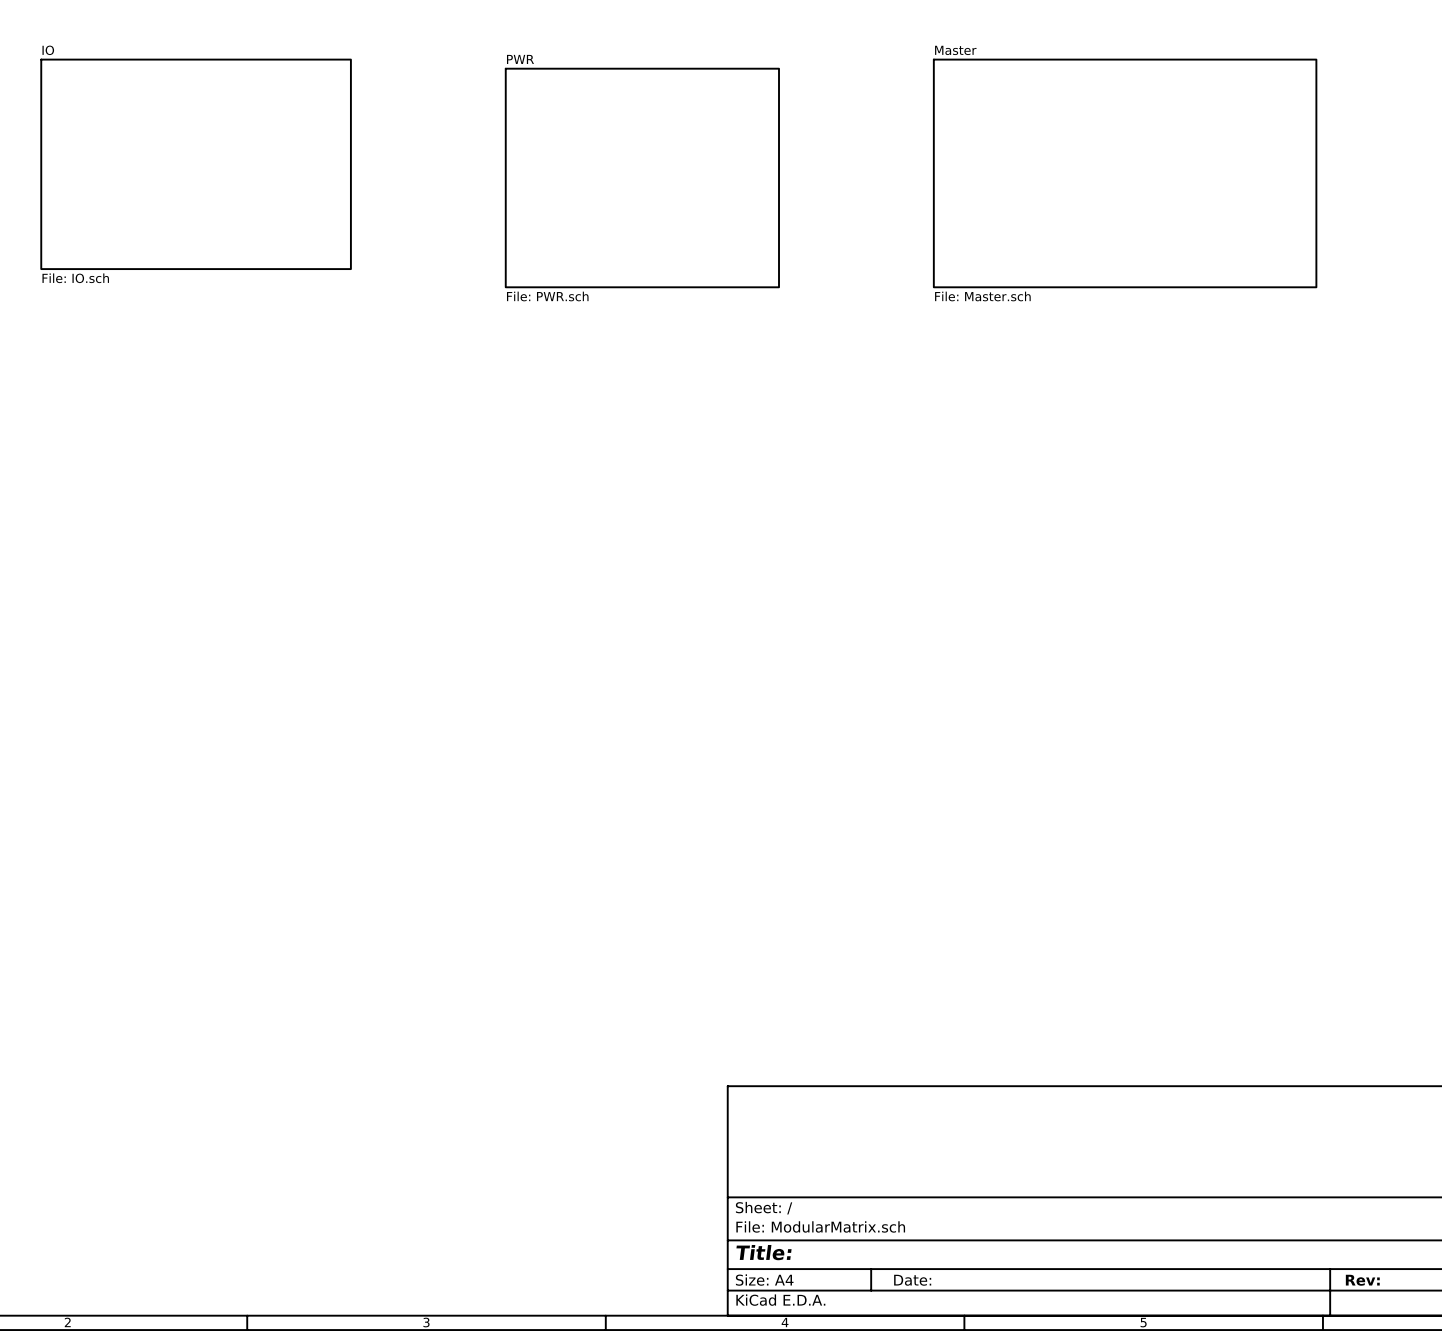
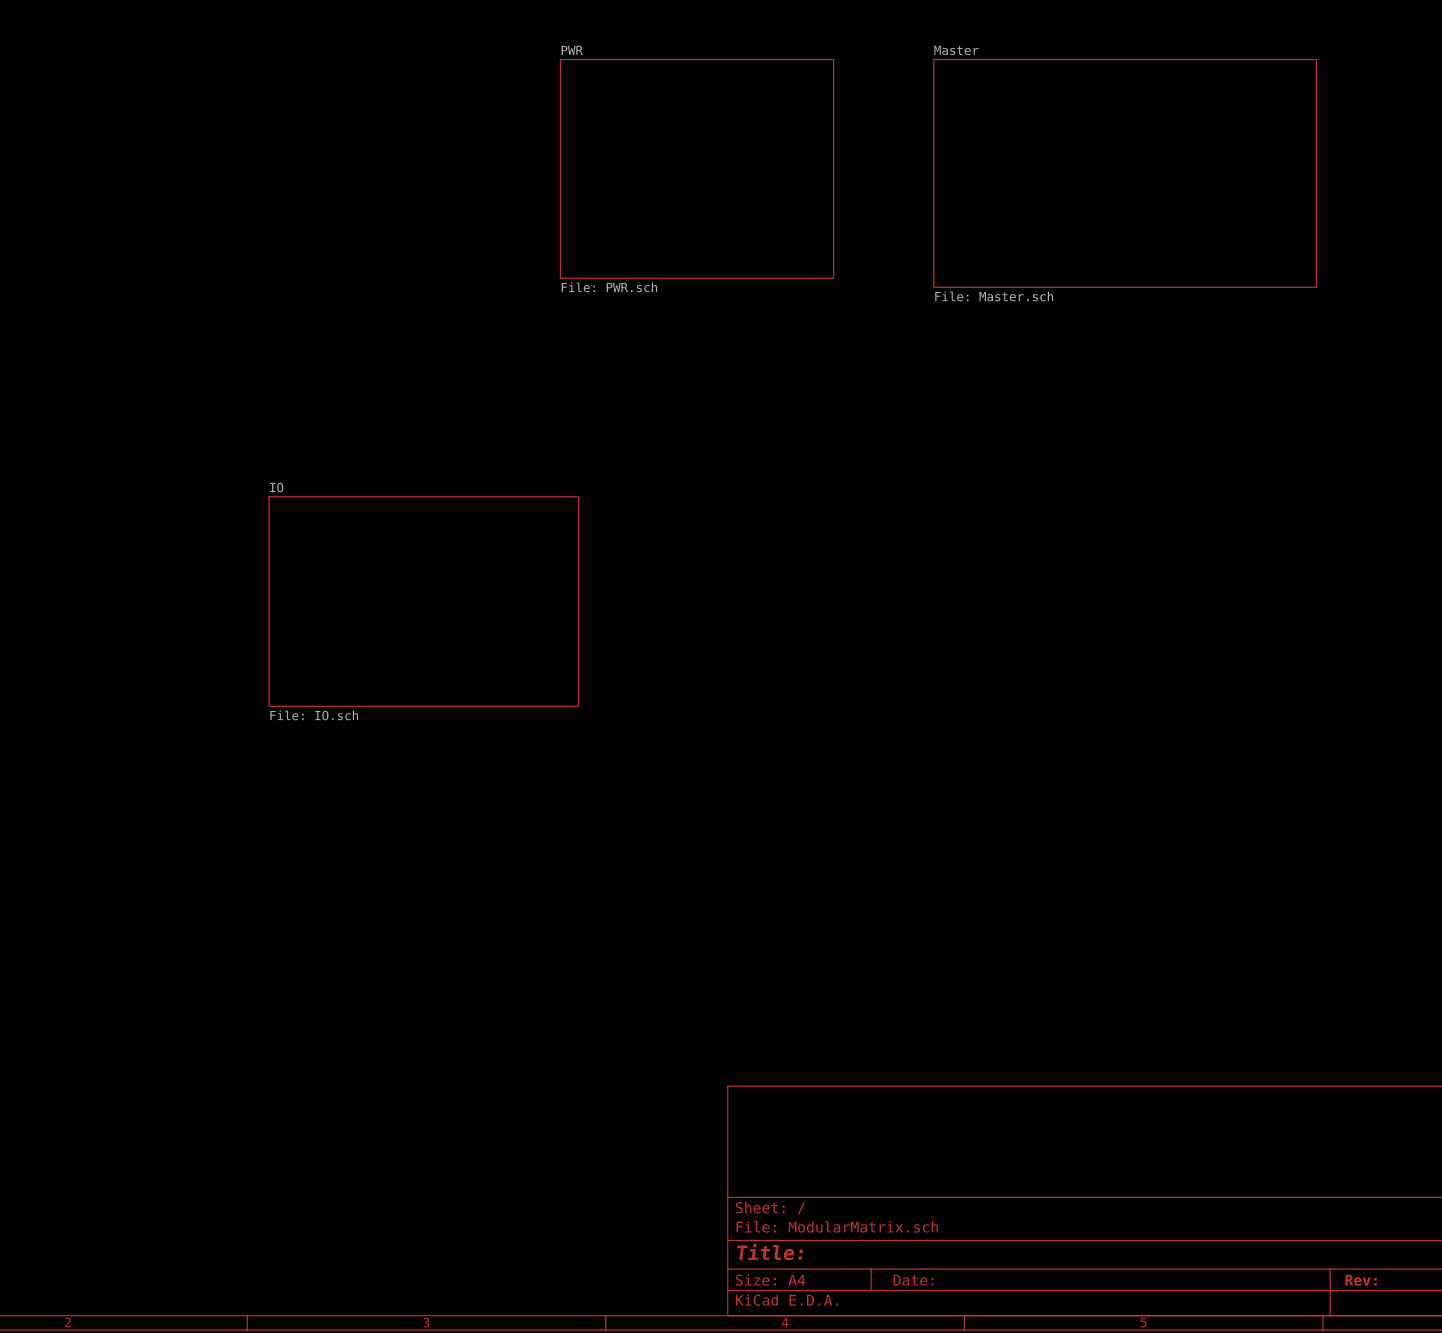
sheet IO: File: IO.sch (196, 164) -> none
sheet PWR position: (642, 177) -> (697, 168)
sheet IO: none -> File: IO.sch (423, 601)

